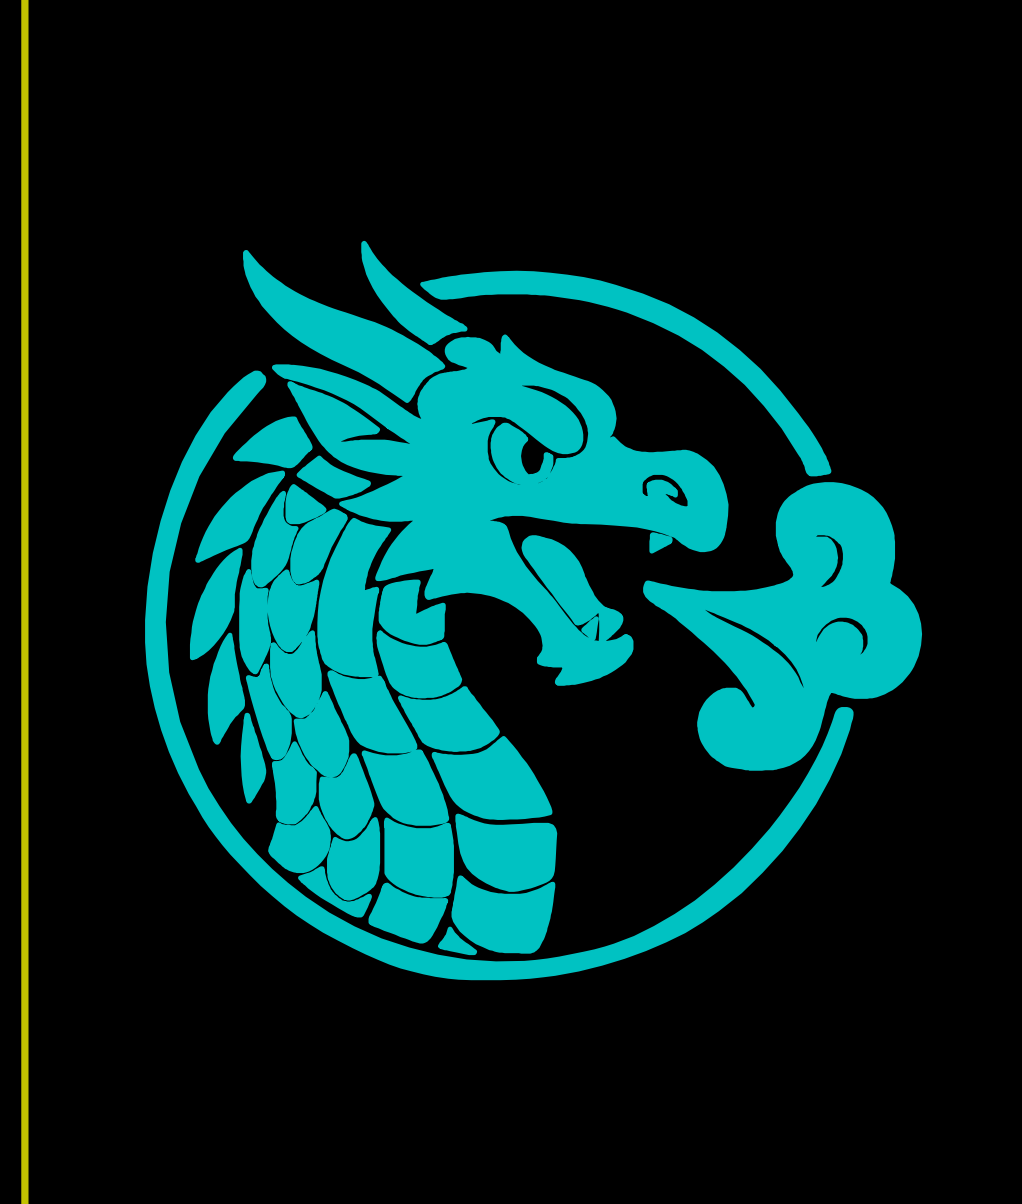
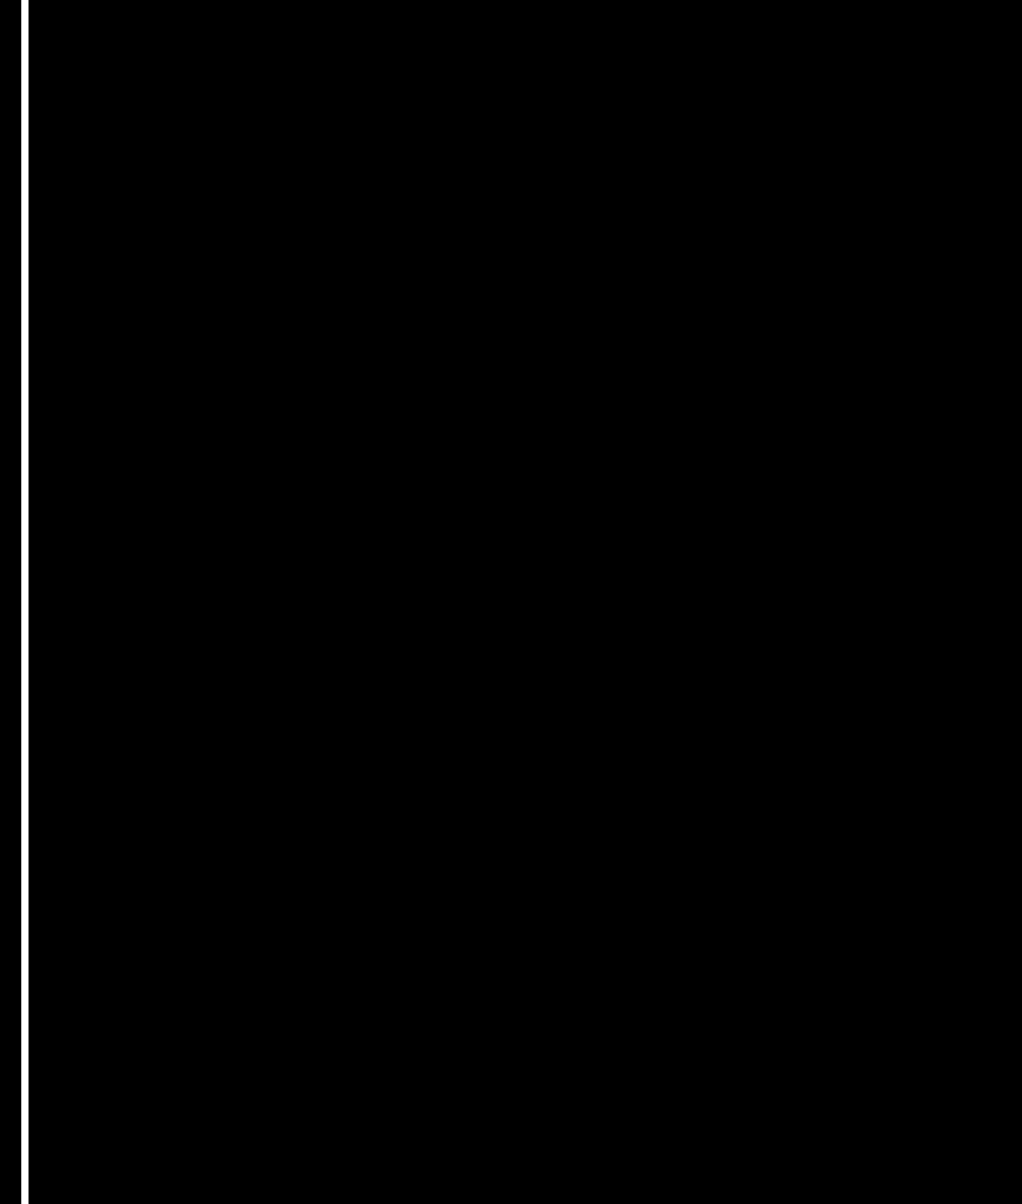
drawing: [145, 240, 923, 981] -> none

